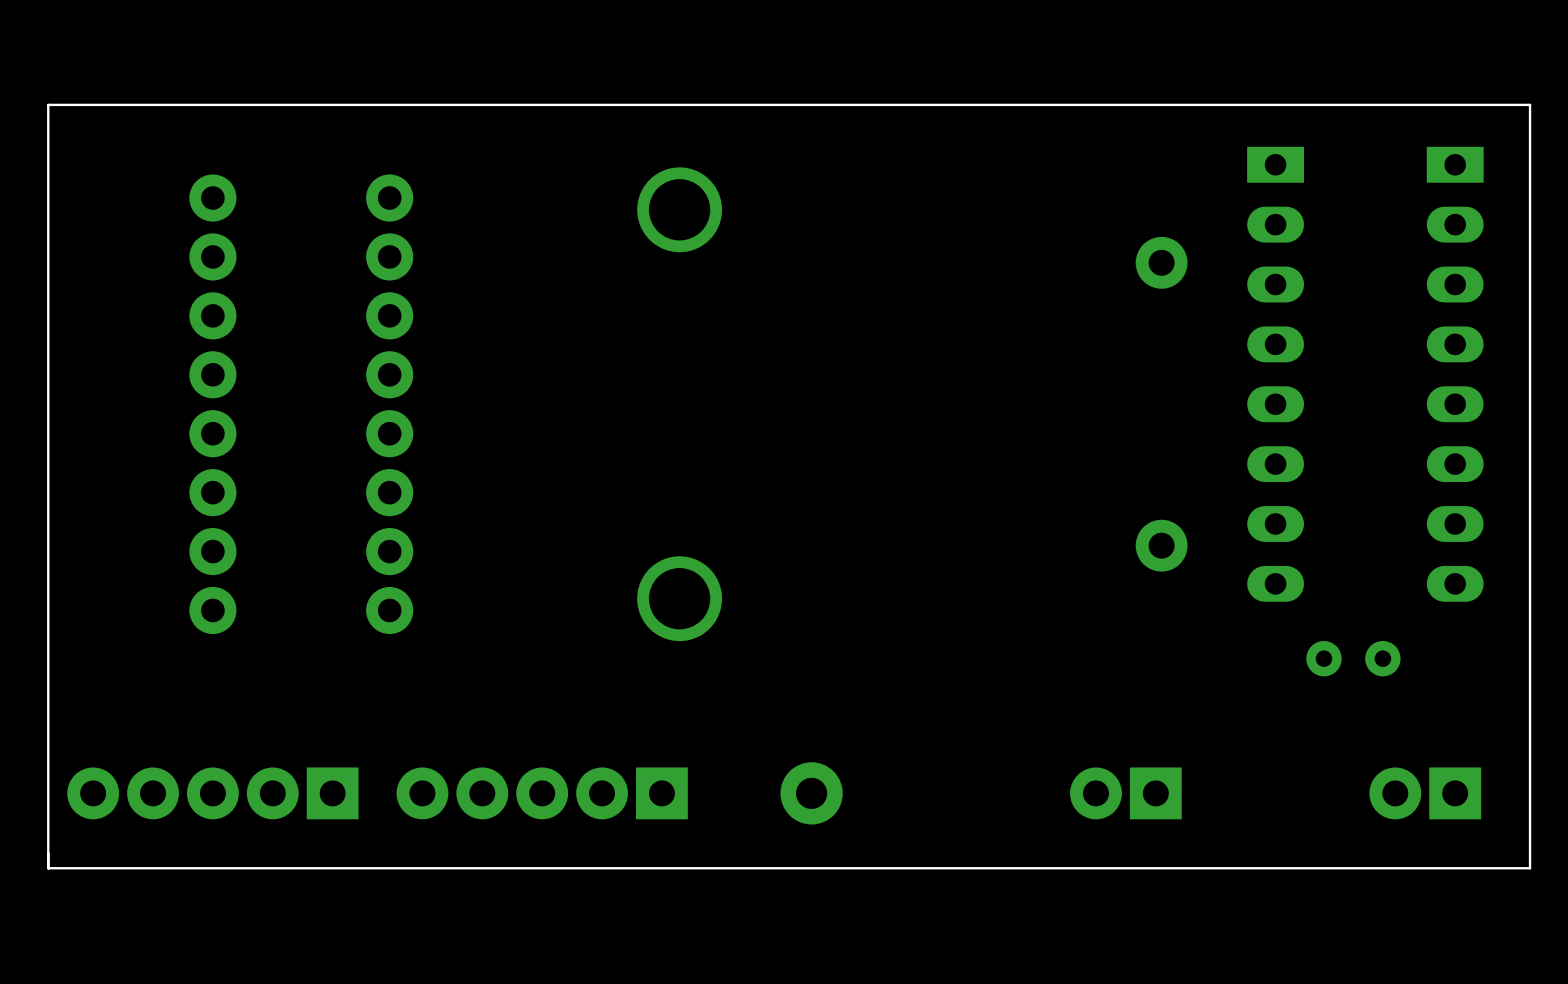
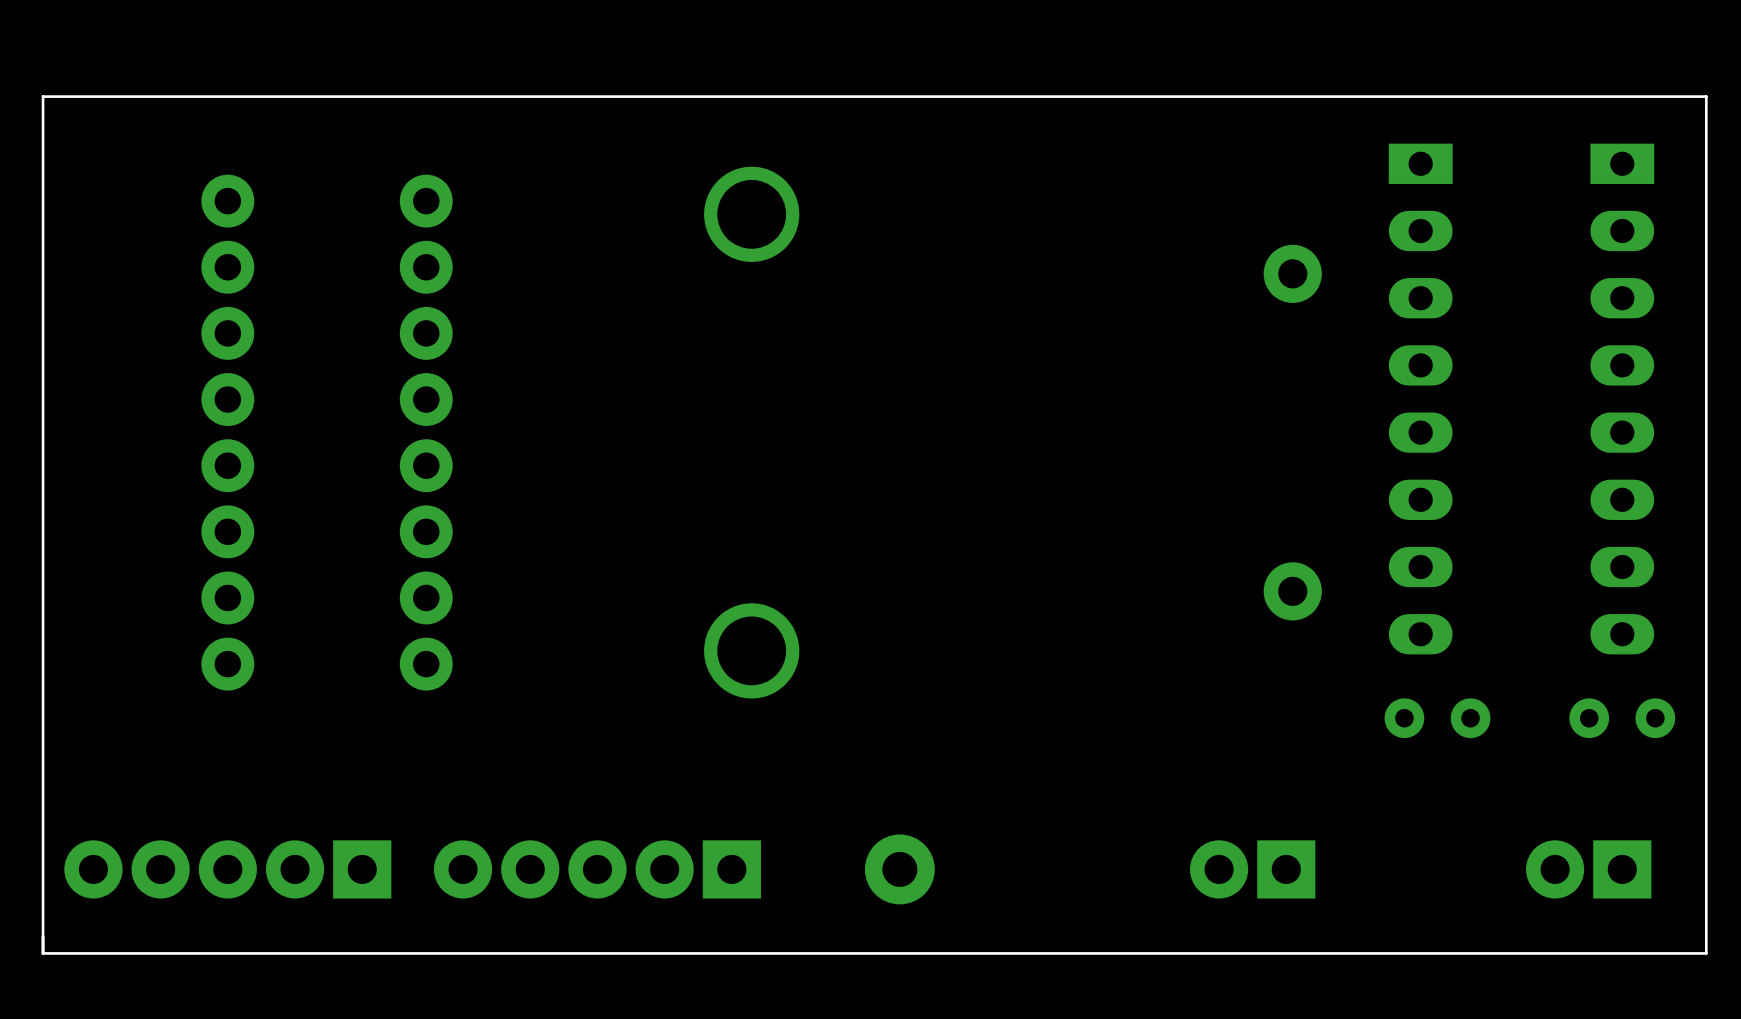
part: none -> (1437, 718)
part: (1353, 658) -> none
part: none -> (1622, 718)

